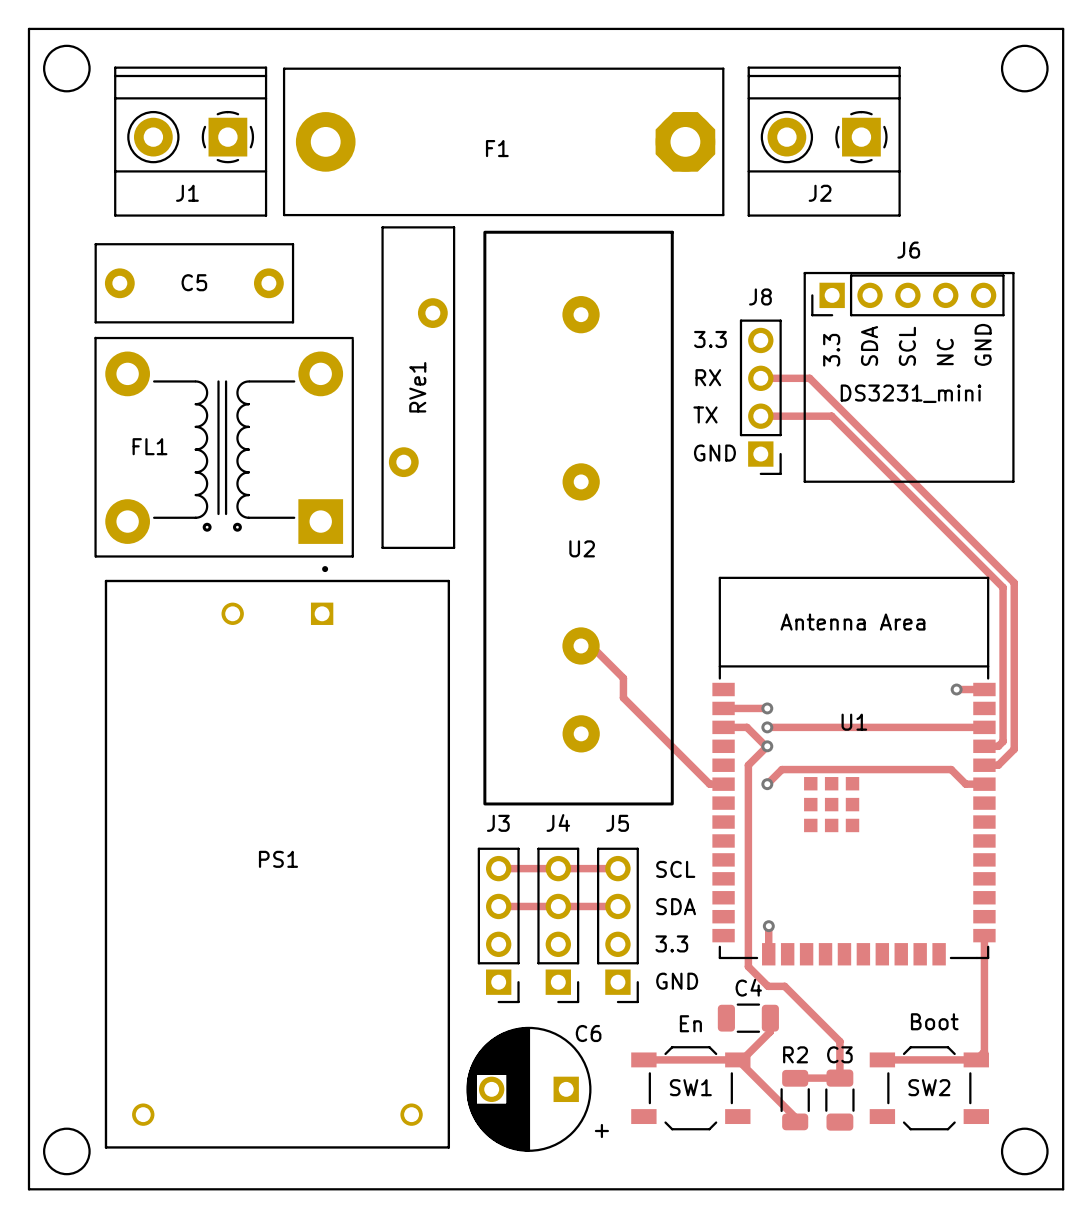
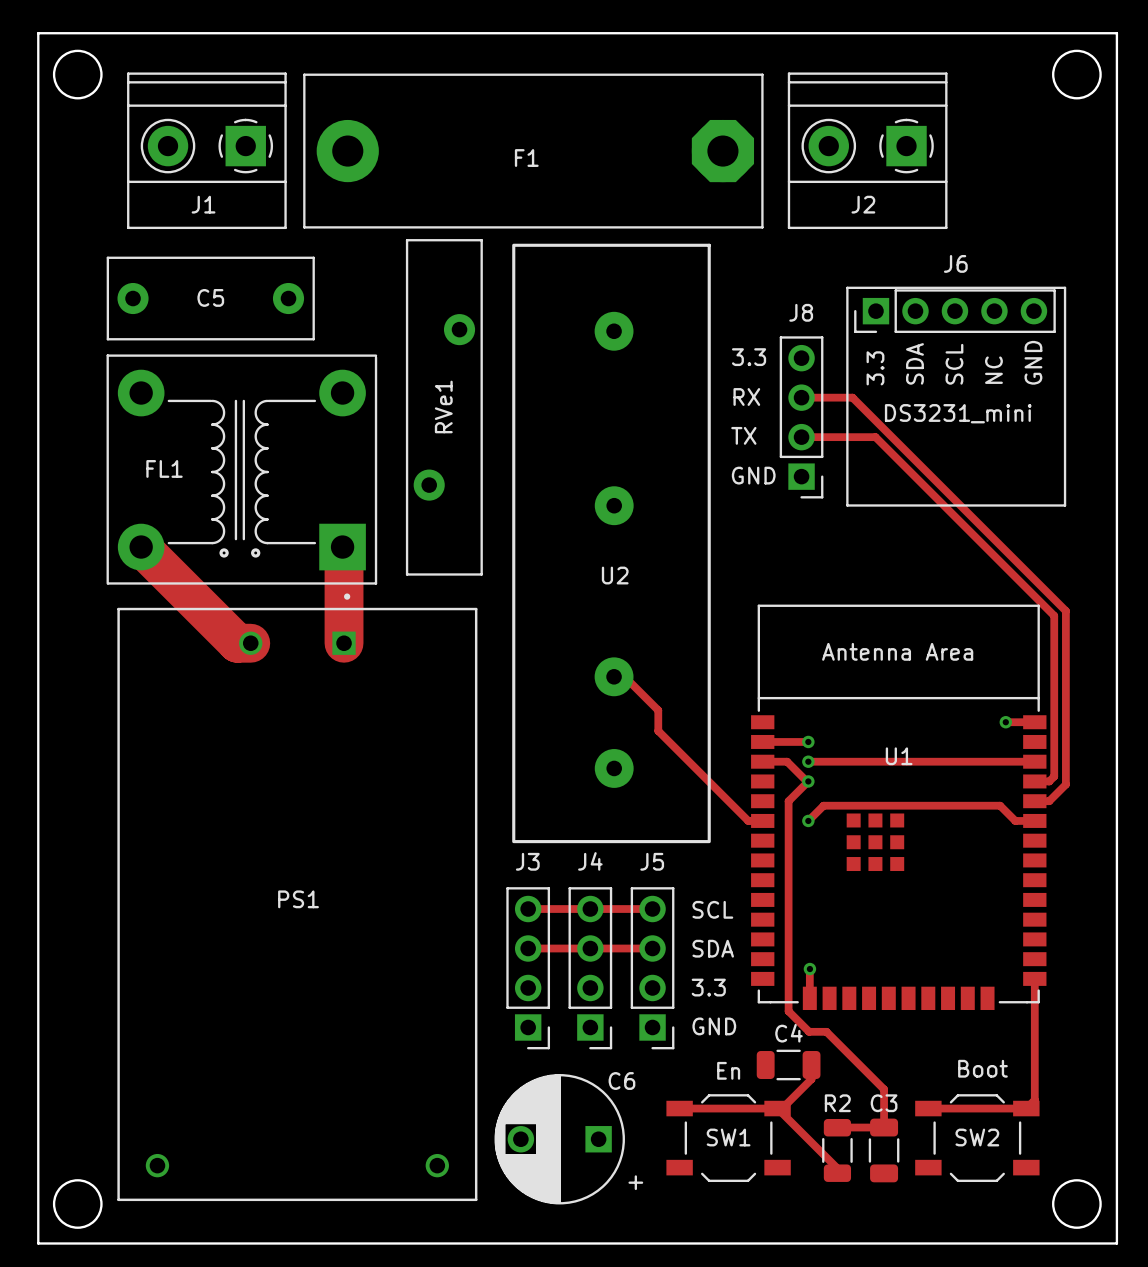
track: none -> (141, 547) (237, 643) (250, 643)
track: none -> (342, 547) (344, 643)

